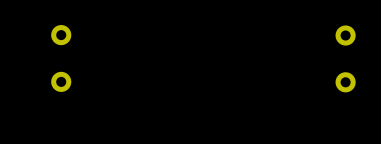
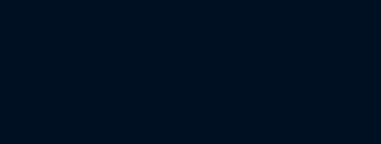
part: (61, 35) -> none
part: (345, 35) -> none
part: (61, 81) -> none
part: (345, 82) -> none

